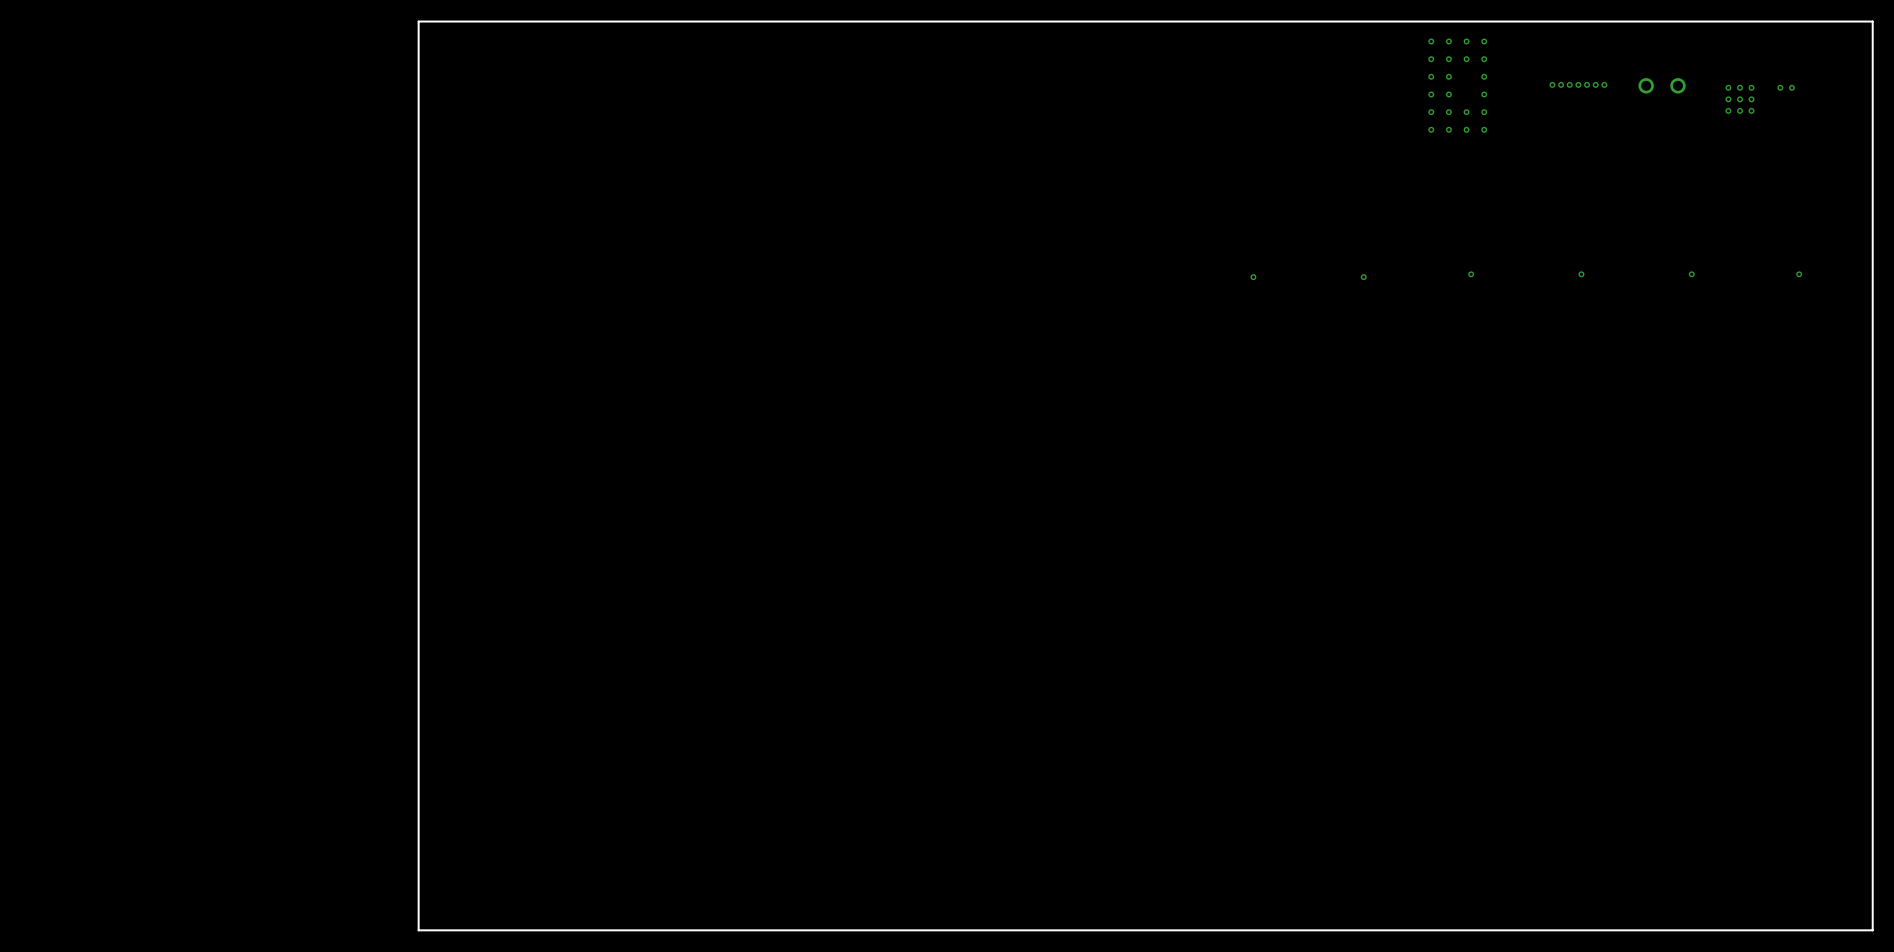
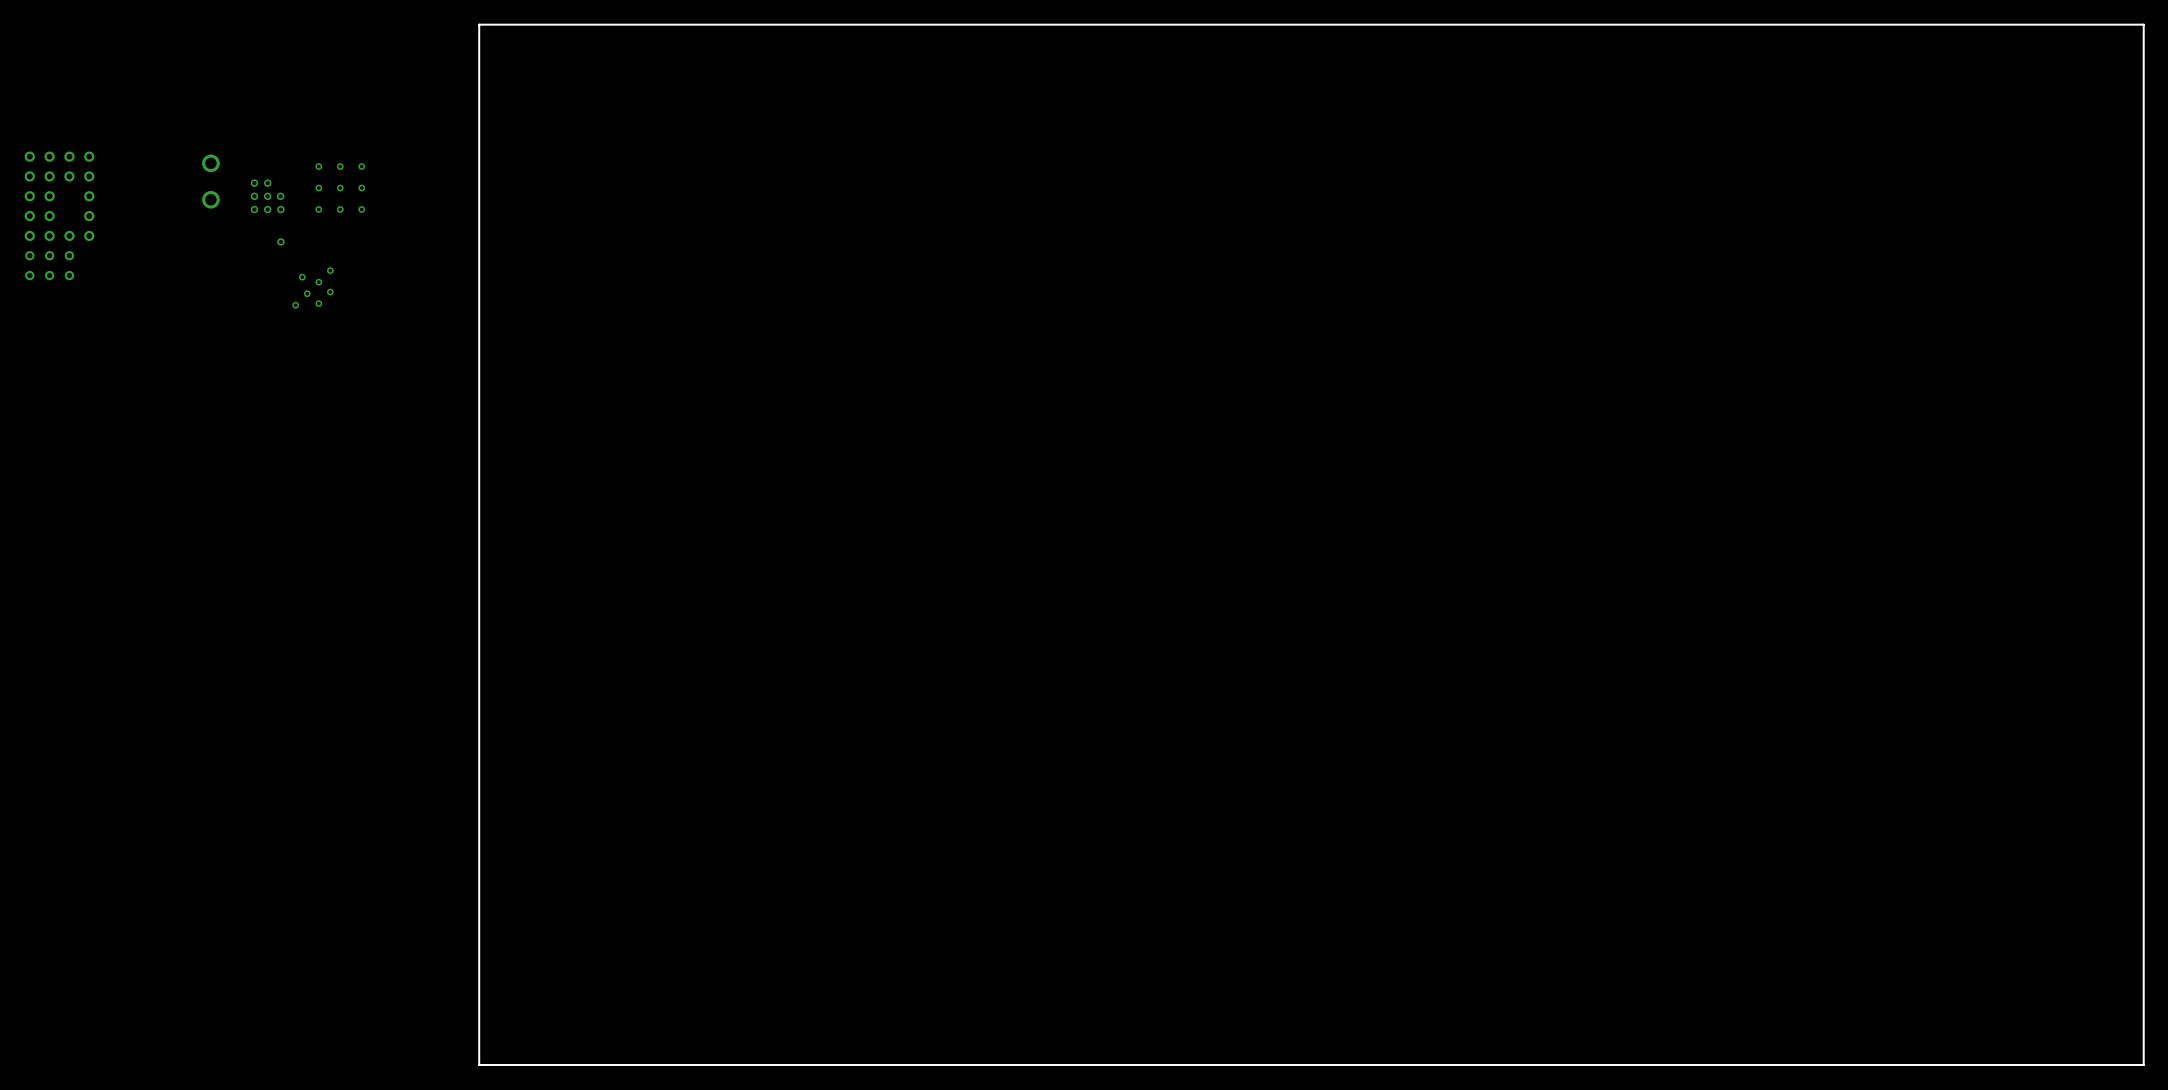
via: (1431, 41) -> none
via: (1448, 41) -> none
via: (1466, 41) -> none
via: (1484, 41) -> none
via: (1431, 59) -> none
via: (1448, 59) -> none
via: (1466, 59) -> none
via: (1484, 59) -> none
via: (1431, 76) -> none
via: (1448, 76) -> none
via: (1484, 76) -> none
via: (1552, 84) -> none
via: (1561, 84) -> none
via: (1569, 84) -> none
via: (1578, 84) -> none
via: (1587, 84) -> none
via: (1595, 84) -> none
via: (1604, 84) -> none
part: (1662, 85) -> none
via: (1728, 87) -> none
via: (1739, 87) -> none
via: (1751, 87) -> none
via: (1780, 87) -> none
via: (1791, 87) -> none
via: (1431, 94) -> none
via: (1448, 94) -> none
via: (1484, 94) -> none
via: (1728, 99) -> none
via: (1739, 99) -> none
via: (1751, 99) -> none
via: (1728, 110) -> none
via: (1739, 110) -> none
via: (1751, 110) -> none
via: (1431, 112) -> none
via: (1448, 112) -> none
via: (1466, 112) -> none
via: (1484, 112) -> none
via: (1431, 129) -> none
via: (1448, 129) -> none
via: (1466, 129) -> none
via: (1484, 129) -> none
via: none -> (29, 156)
via: none -> (49, 156)
via: none -> (69, 156)
via: none -> (89, 156)
via: none -> (318, 166)
via: none -> (340, 166)
via: none -> (361, 166)
via: none -> (29, 176)
via: none -> (49, 176)
via: none -> (69, 176)
via: none -> (89, 176)
part: none -> (210, 181)
via: none -> (254, 183)
via: none -> (267, 183)
via: none -> (318, 188)
via: none -> (340, 188)
via: none -> (361, 188)
via: none -> (29, 196)
via: none -> (49, 196)
via: none -> (89, 196)
via: none -> (254, 196)
via: none -> (267, 196)
via: none -> (280, 196)
via: none -> (254, 209)
via: none -> (267, 209)
via: none -> (280, 209)
via: none -> (318, 209)
via: none -> (340, 209)
via: none -> (361, 209)
via: none -> (29, 216)
via: none -> (49, 216)
via: none -> (89, 216)
via: none -> (29, 235)
via: none -> (49, 235)
via: none -> (69, 235)
via: none -> (89, 235)
via: none -> (280, 241)
via: none -> (29, 255)
via: none -> (49, 255)
via: none -> (69, 255)
via: none -> (330, 270)
via: none -> (29, 275)
via: none -> (49, 275)
via: none -> (69, 275)
via: none -> (302, 277)
via: none -> (318, 282)
via: none -> (330, 292)
via: none -> (307, 293)
via: none -> (318, 303)
via: none -> (295, 305)
via: (1471, 274) -> none
via: (1581, 274) -> none
via: (1691, 274) -> none
via: (1799, 274) -> none
via: (1253, 277) -> none
via: (1363, 277) -> none

